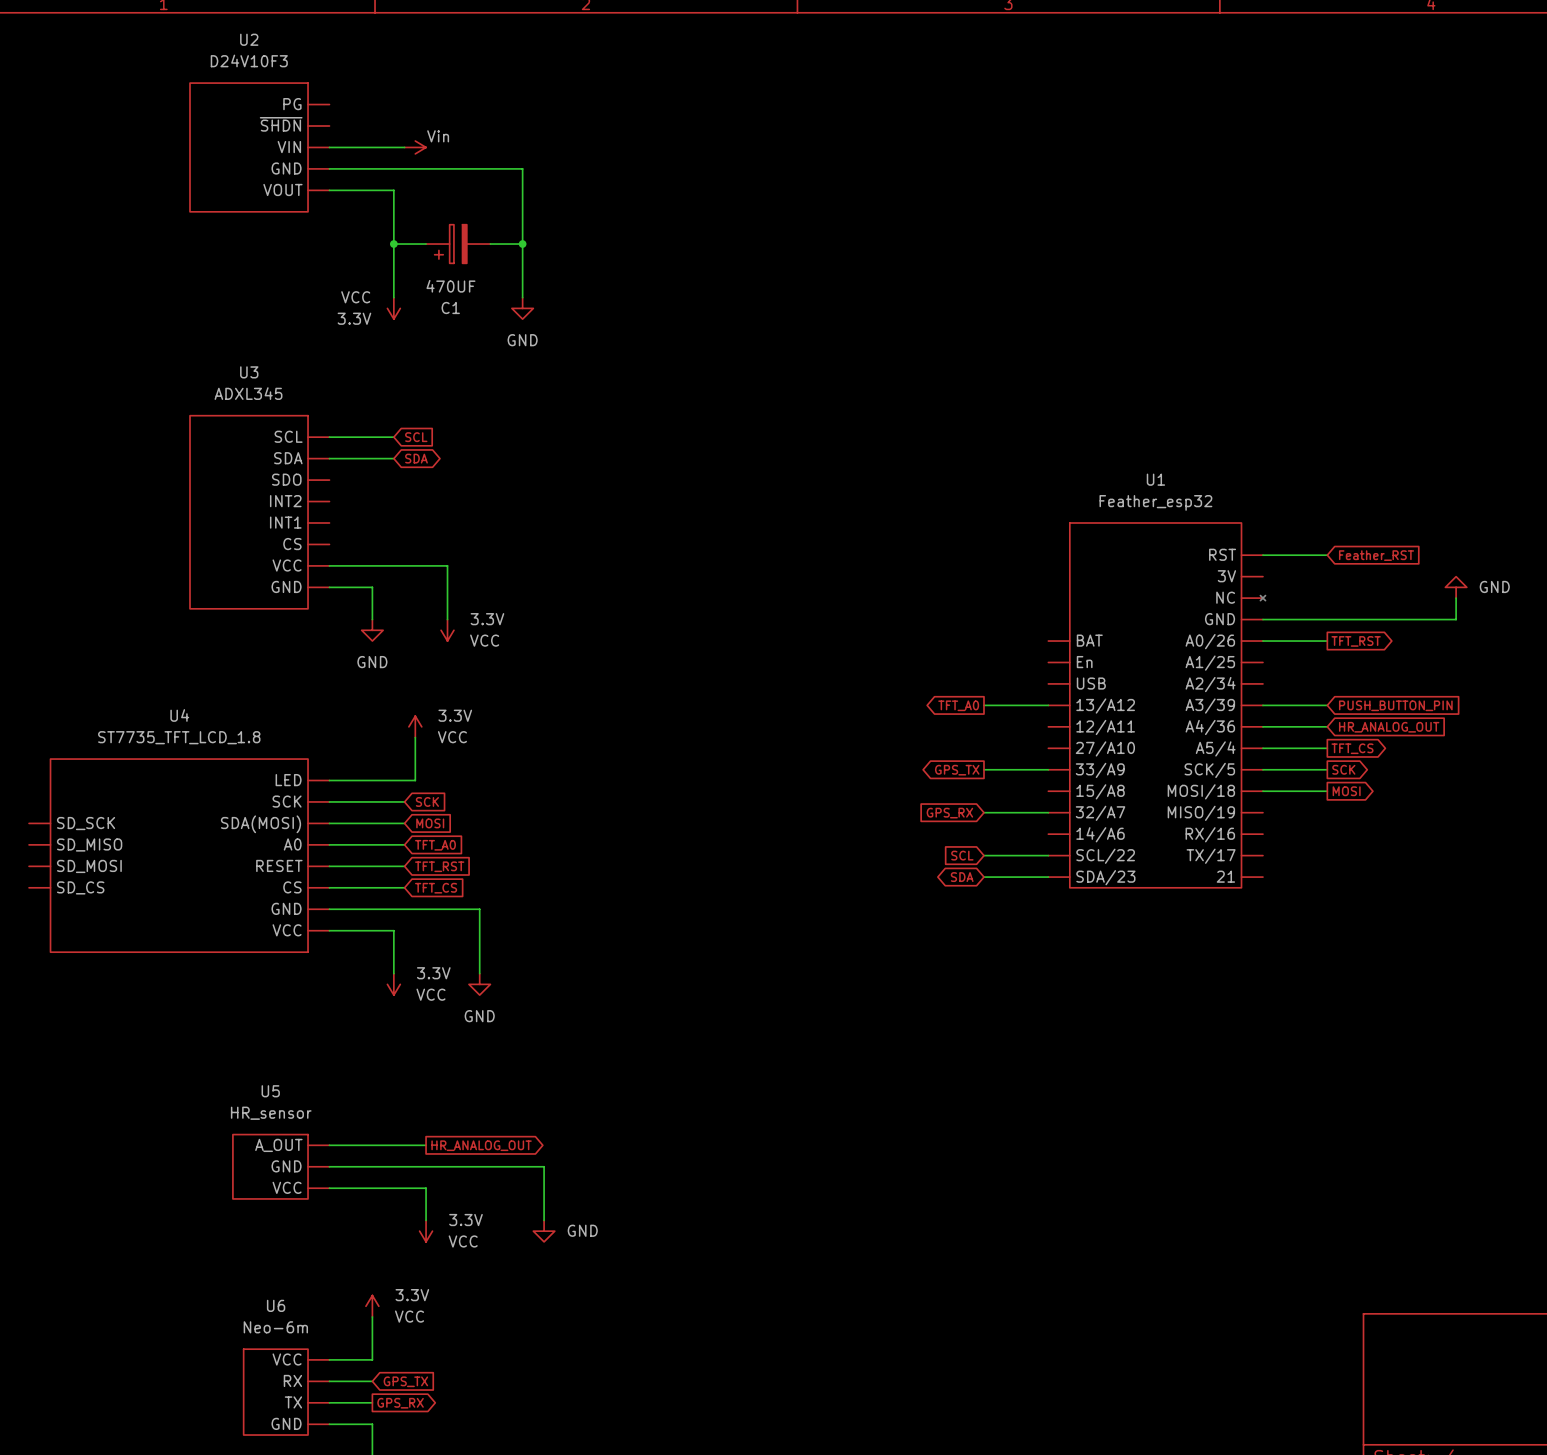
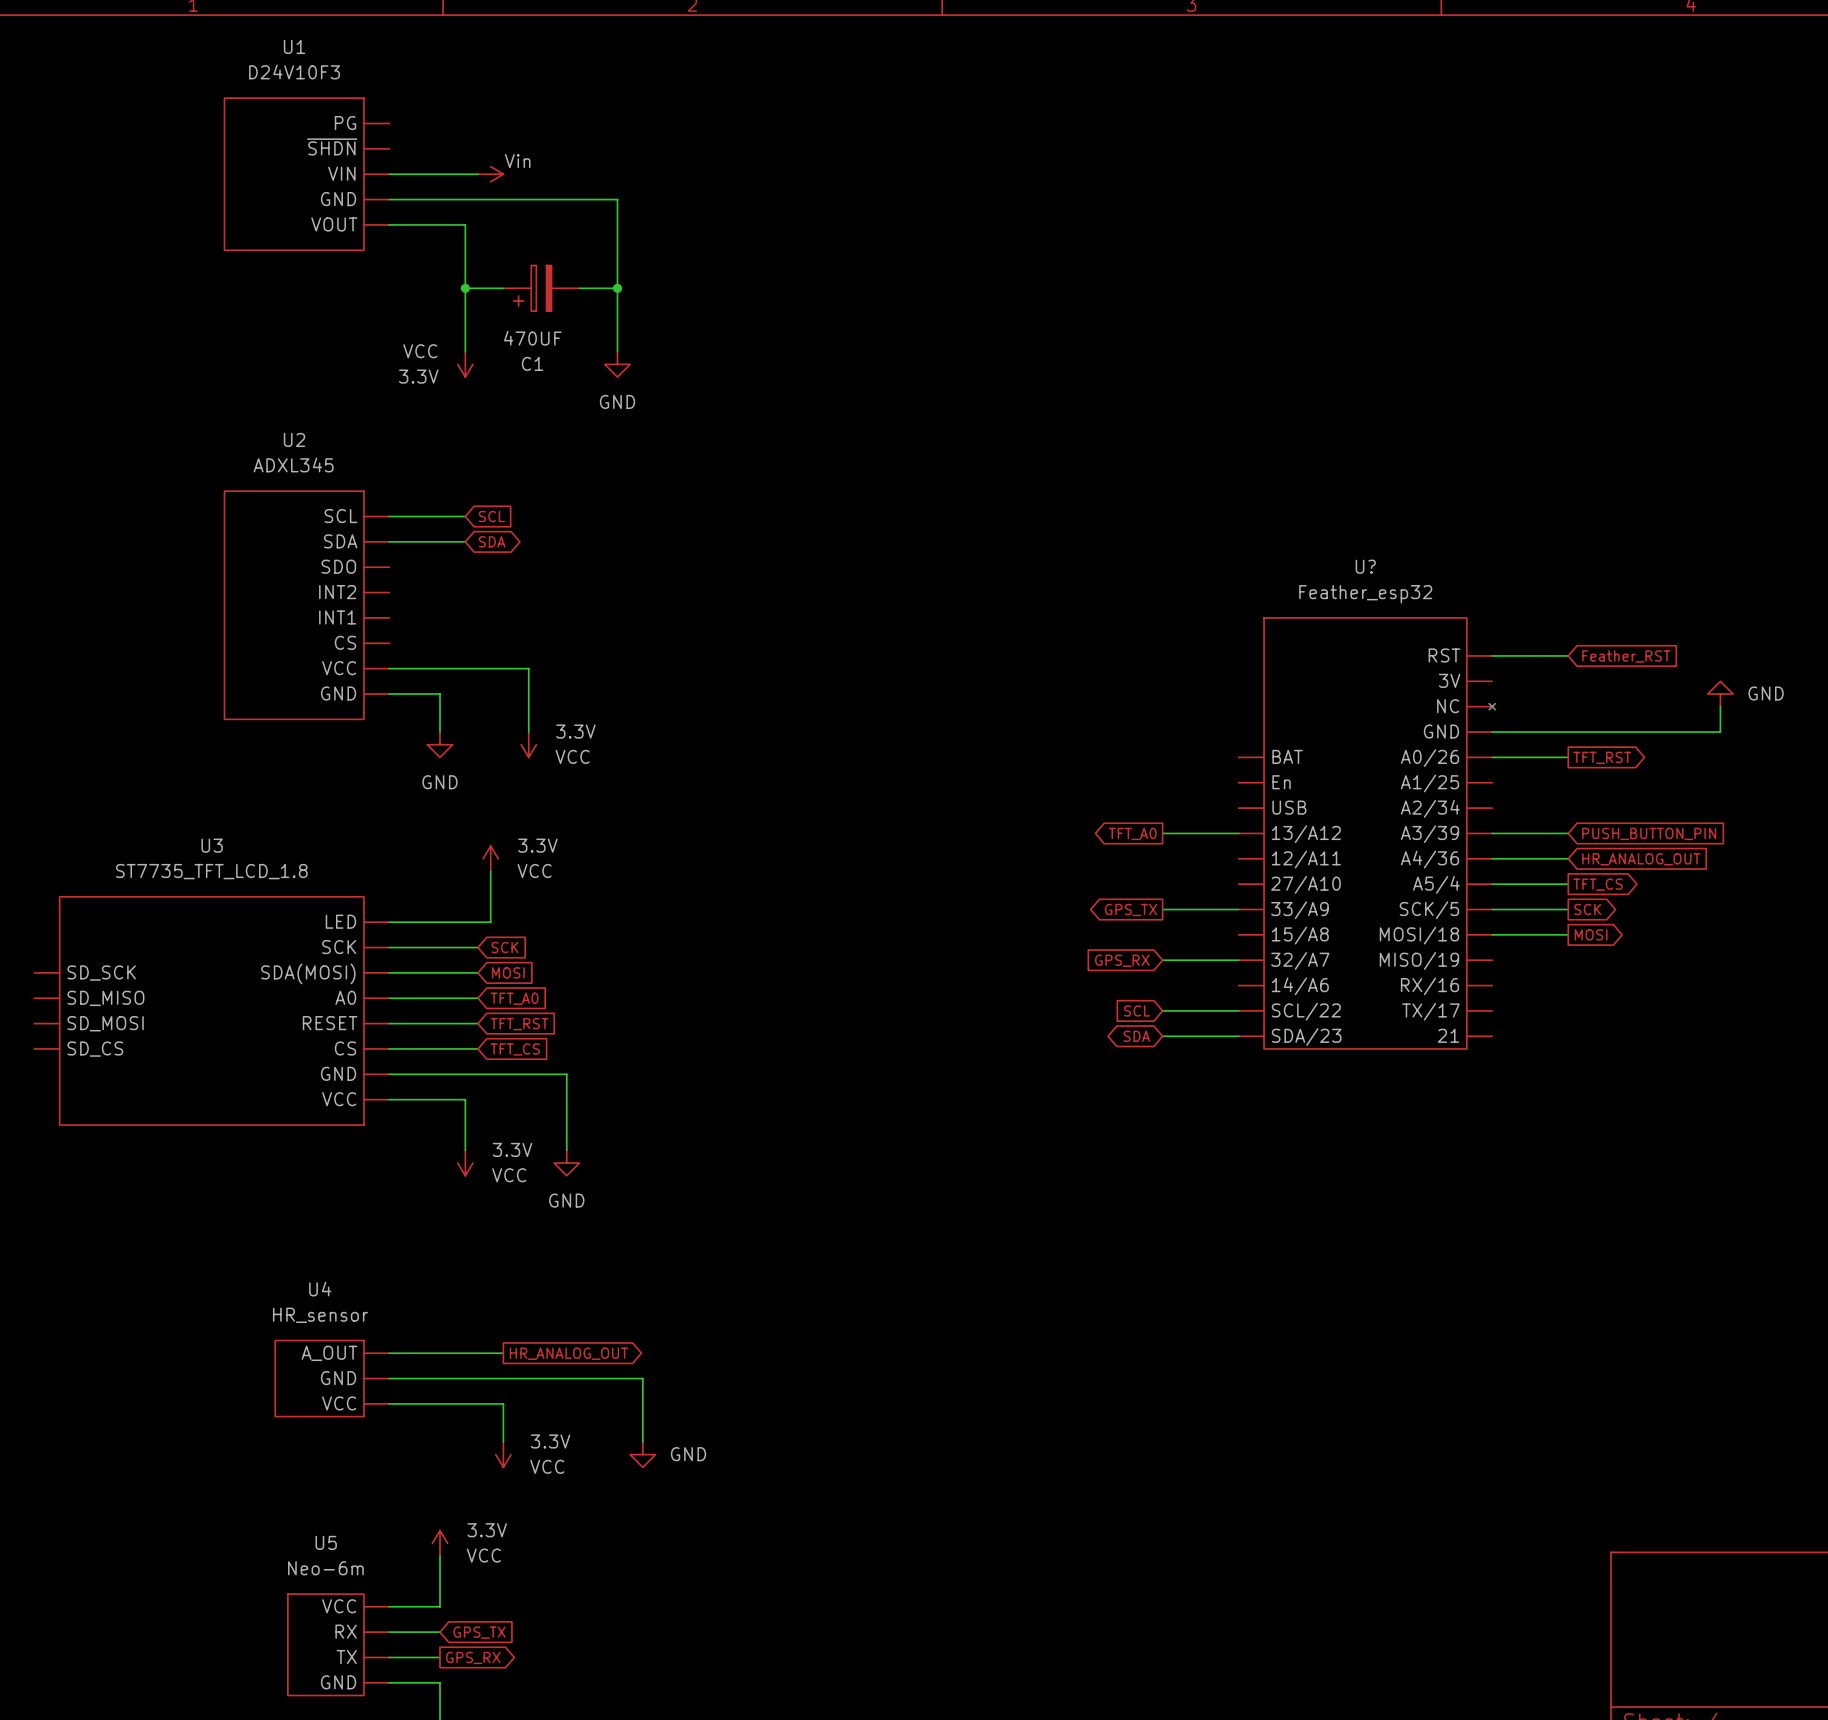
U2 name: U2 (249, 39) -> U1 (294, 46)
U3 name: U3 (249, 372) -> U2 (294, 439)
U1 name: U1 (1155, 479) -> U? (1365, 566)
U4 name: U4 (179, 715) -> U3 (212, 845)
U5 name: U5 (270, 1091) -> U4 (320, 1289)
U6 name: U6 (276, 1305) -> U5 (326, 1542)

